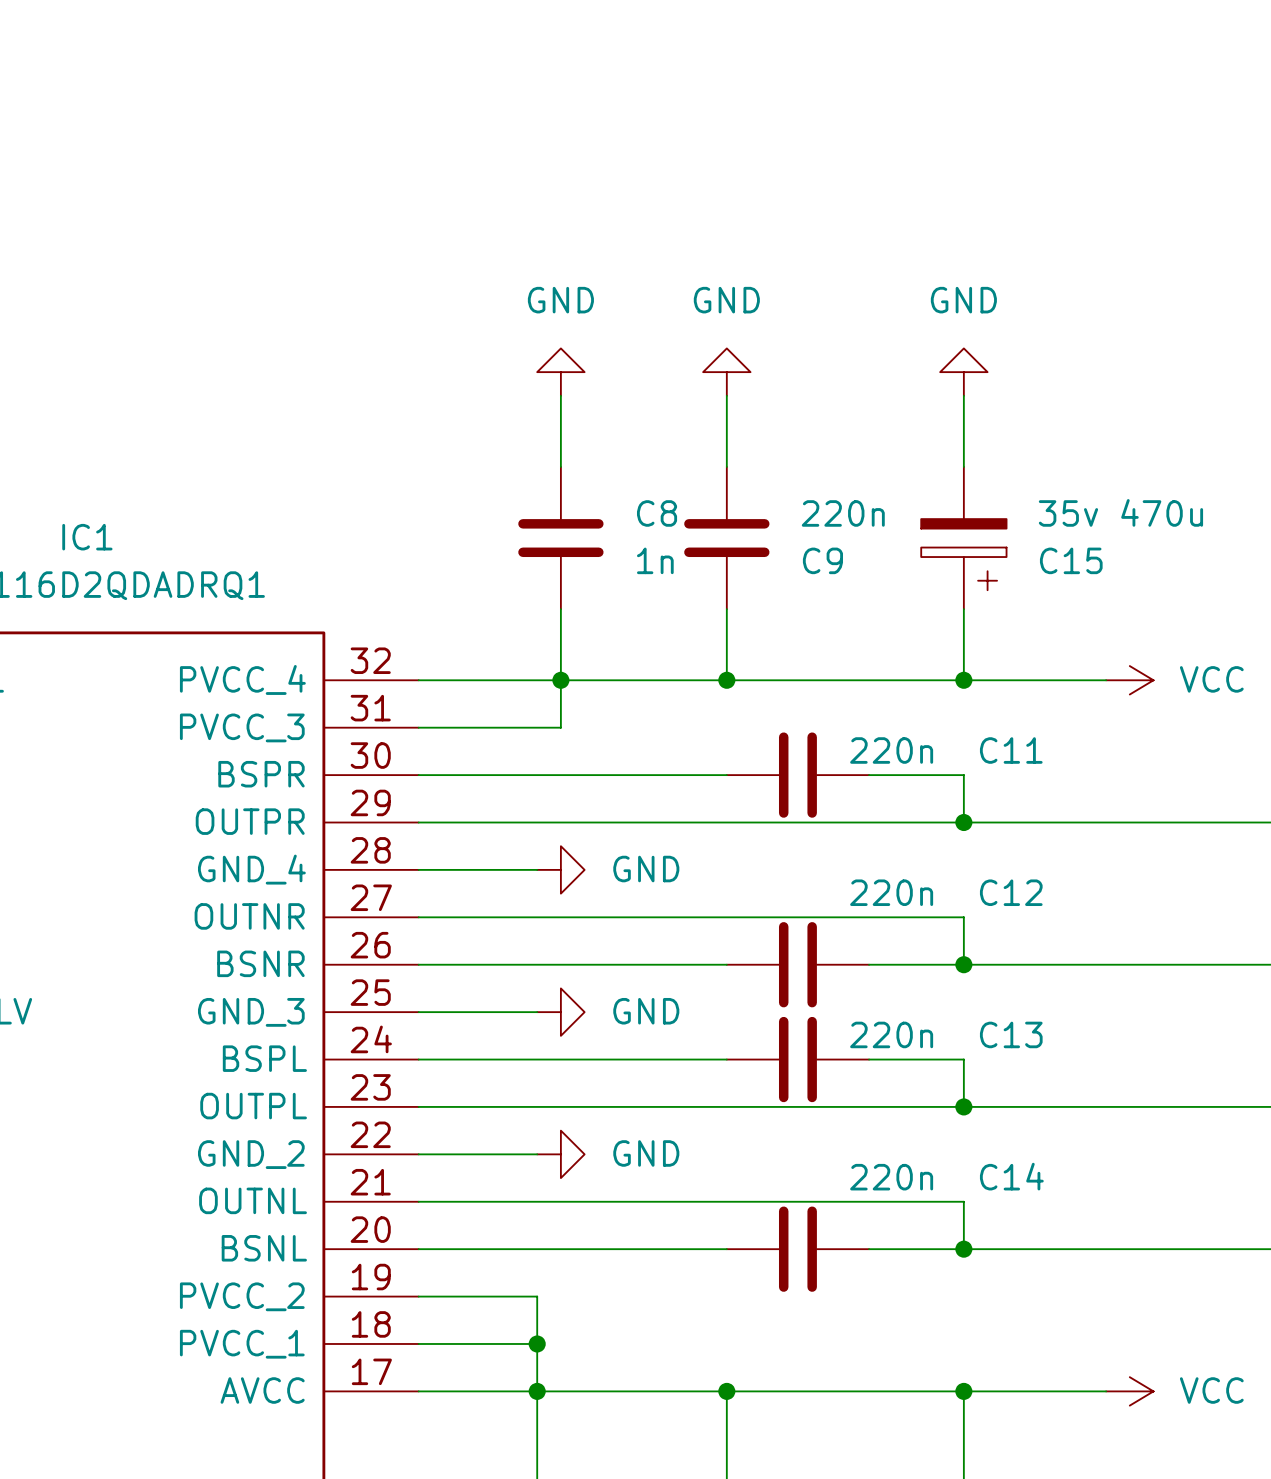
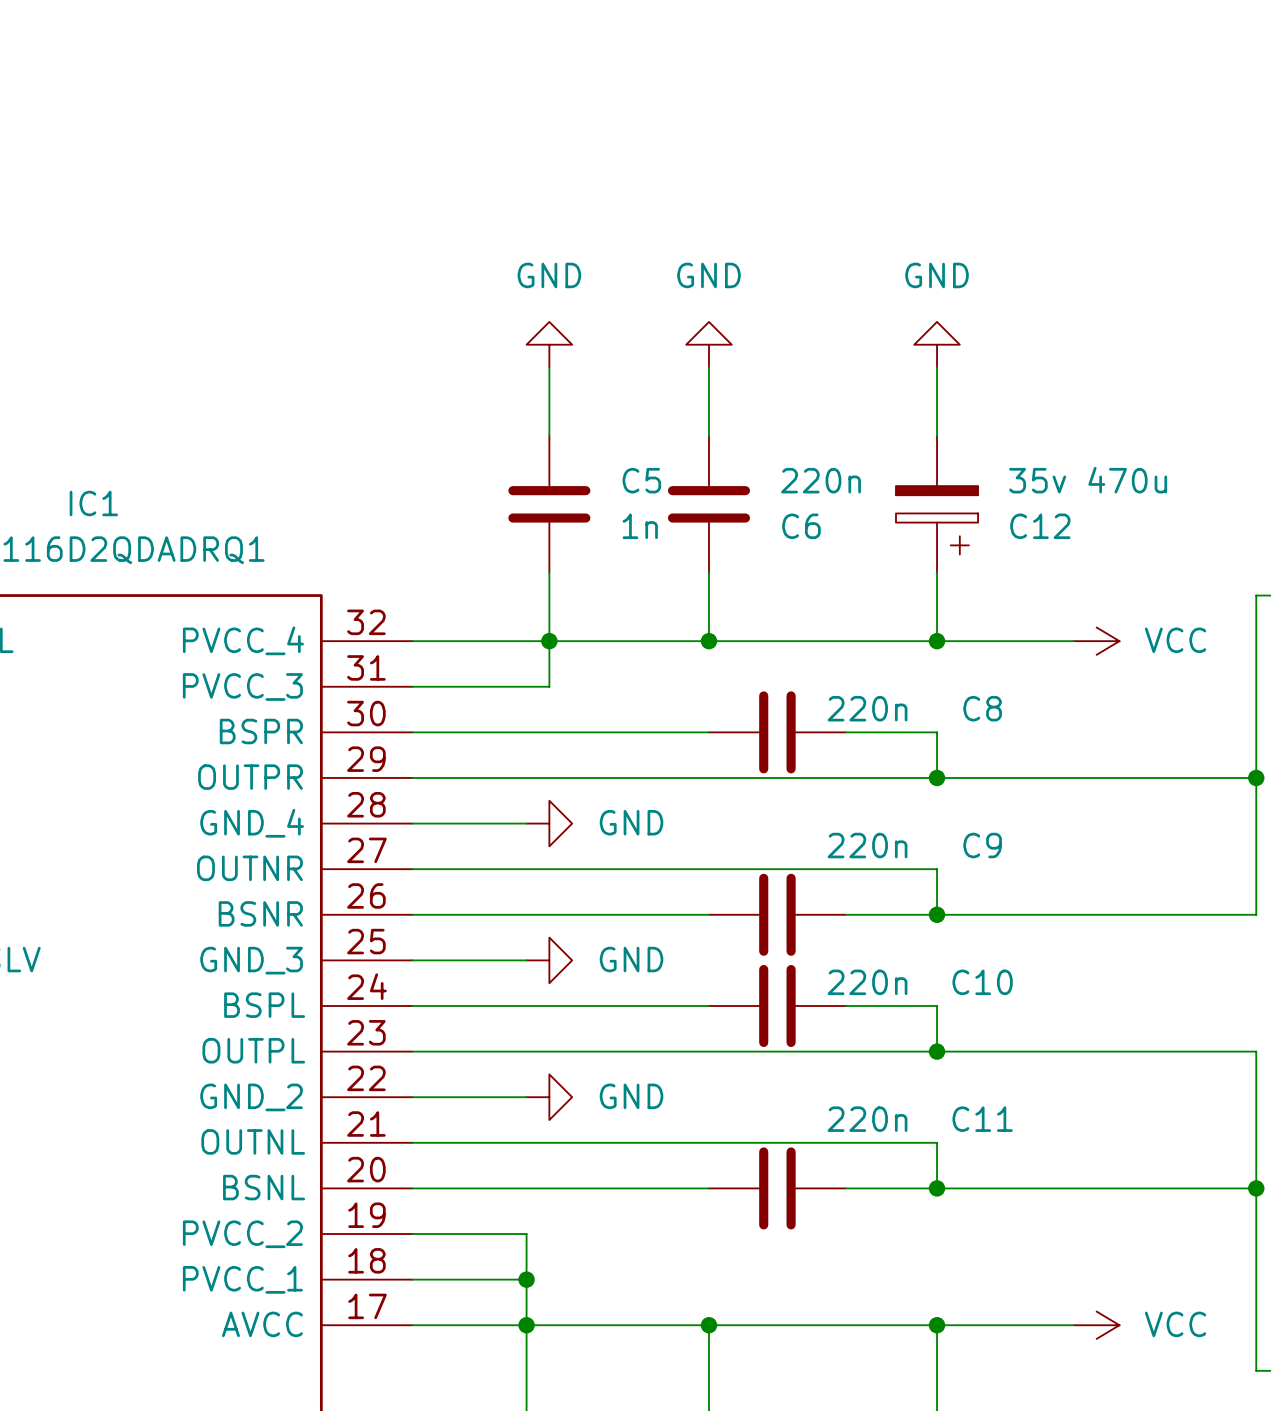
C8 name: C8 (657, 513) -> C5 (641, 480)
C9 name: C9 (822, 560) -> C6 (801, 526)
C15 name: C15 (1071, 560) -> C12 (1040, 526)
C11 name: C11 (1011, 750) -> C8 (982, 708)
C12 name: C12 (1011, 892) -> C9 (982, 845)
C13 name: C13 (1011, 1034) -> C10 (982, 982)
C14 name: C14 (1011, 1176) -> C11 (982, 1119)

